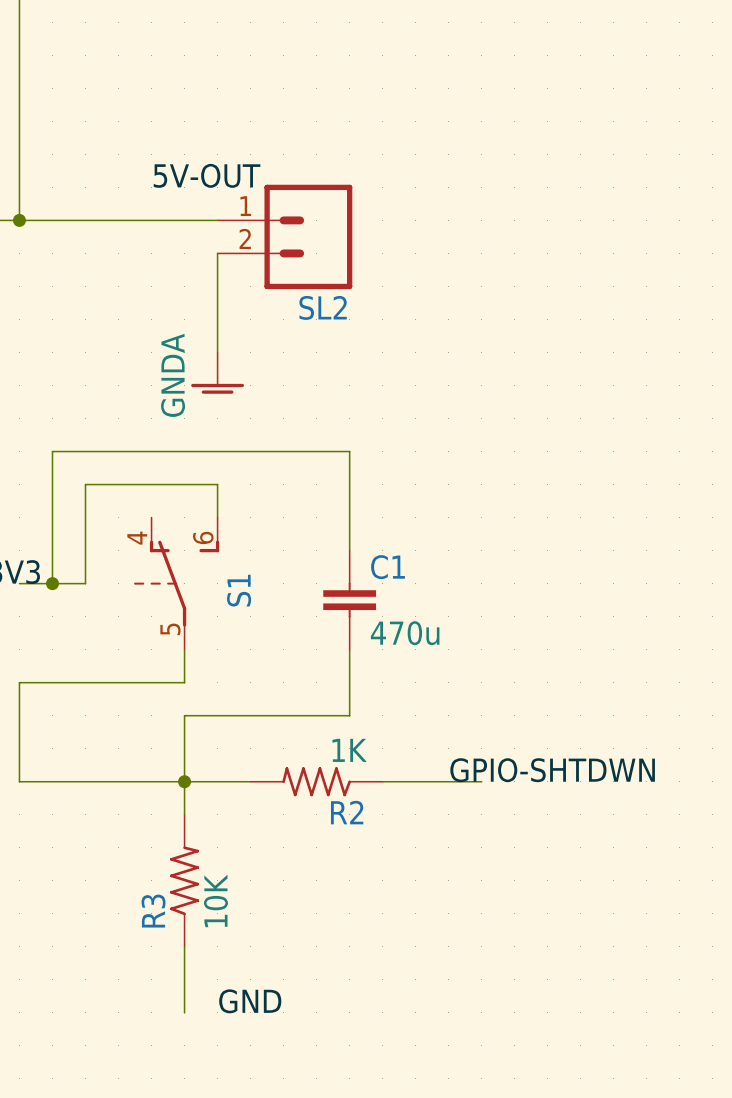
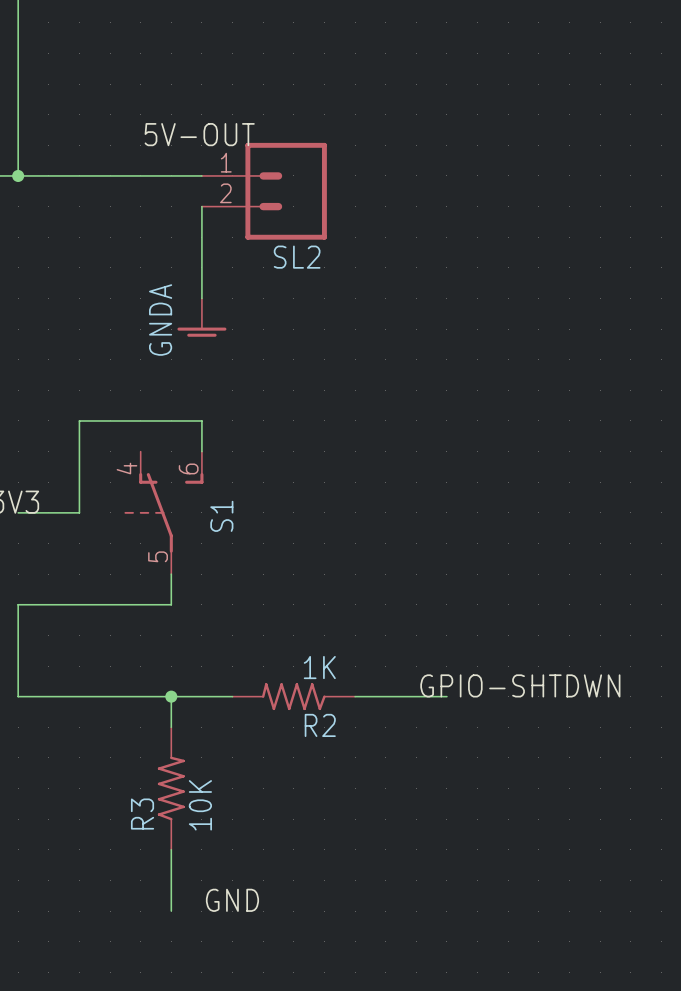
wire: (349, 550) (349, 451) (52, 451) (52, 583) -> none
junction: (52, 583) -> none
C1: 470u (349, 600) -> none
wire: (349, 649) (349, 715) (184, 715) (184, 781) -> none

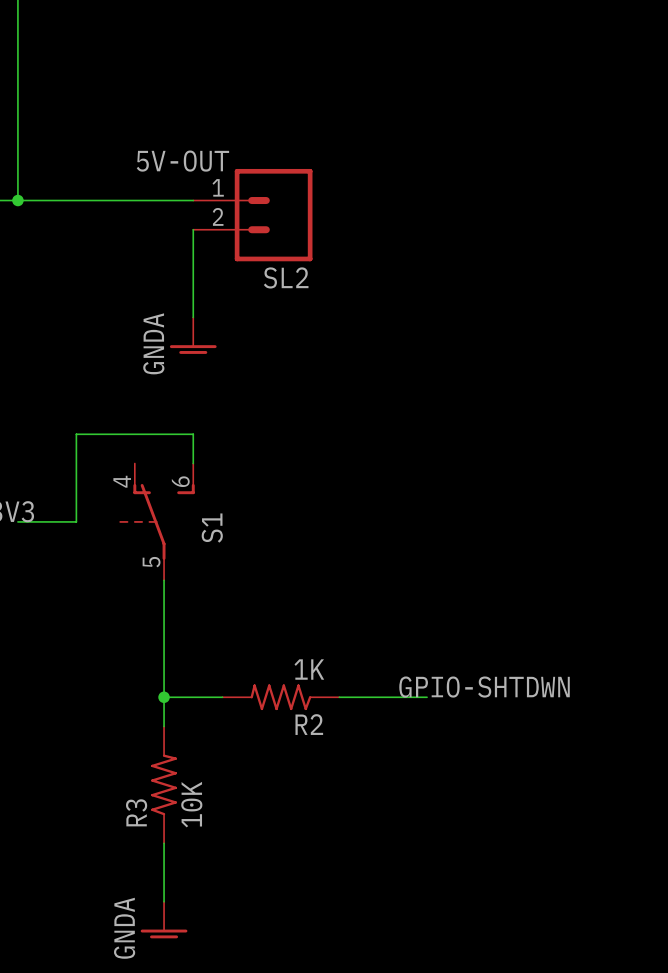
wire: (171, 604) (18, 604) (18, 696) (171, 696) -> (164, 609) (164, 697)
label: GND (232, 900) -> none
power symbol: none -> GNDA (164, 920)

